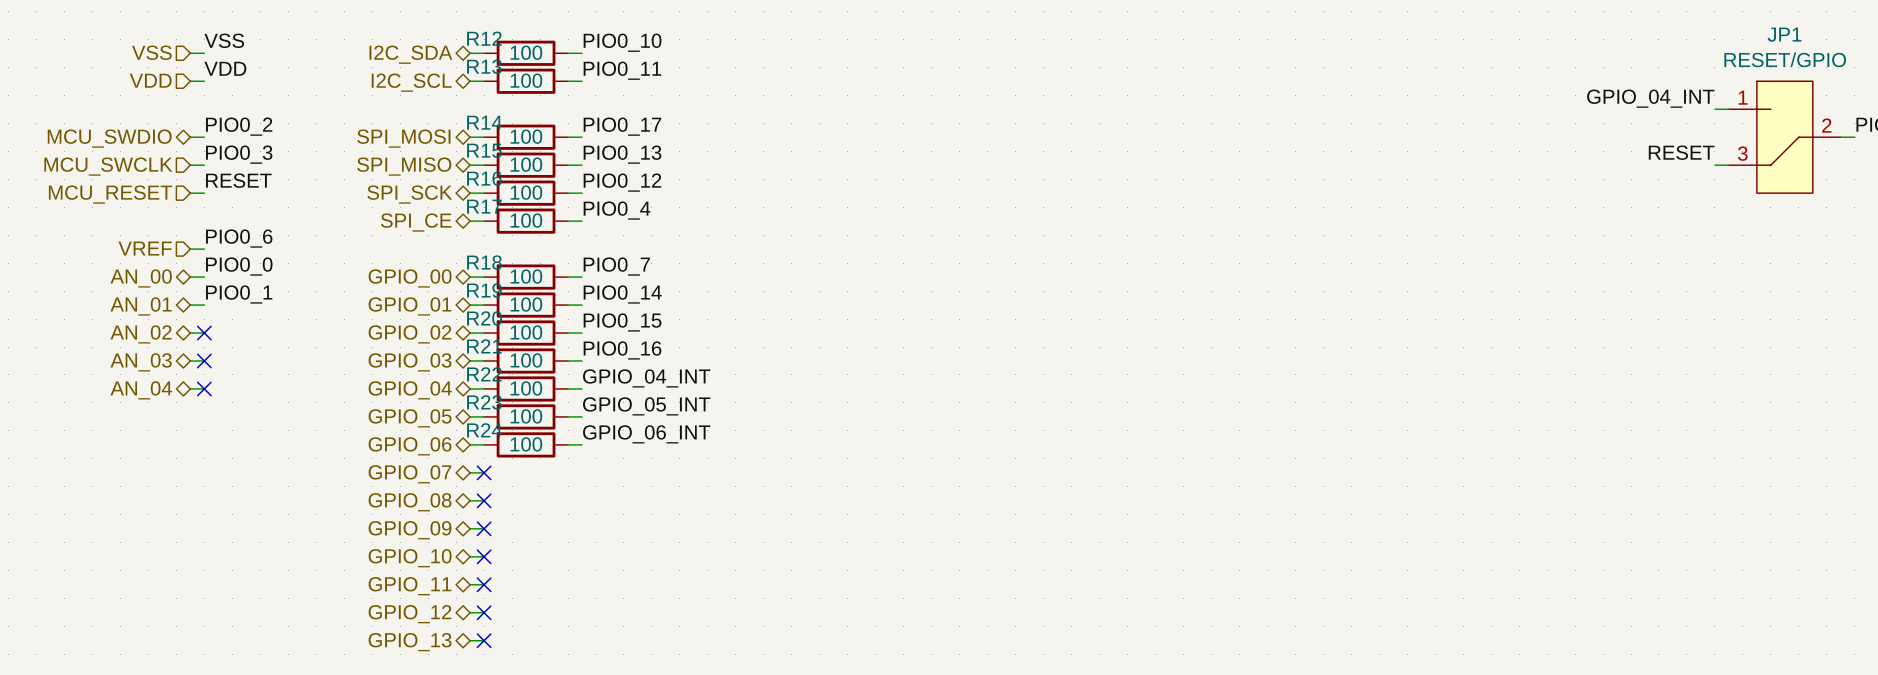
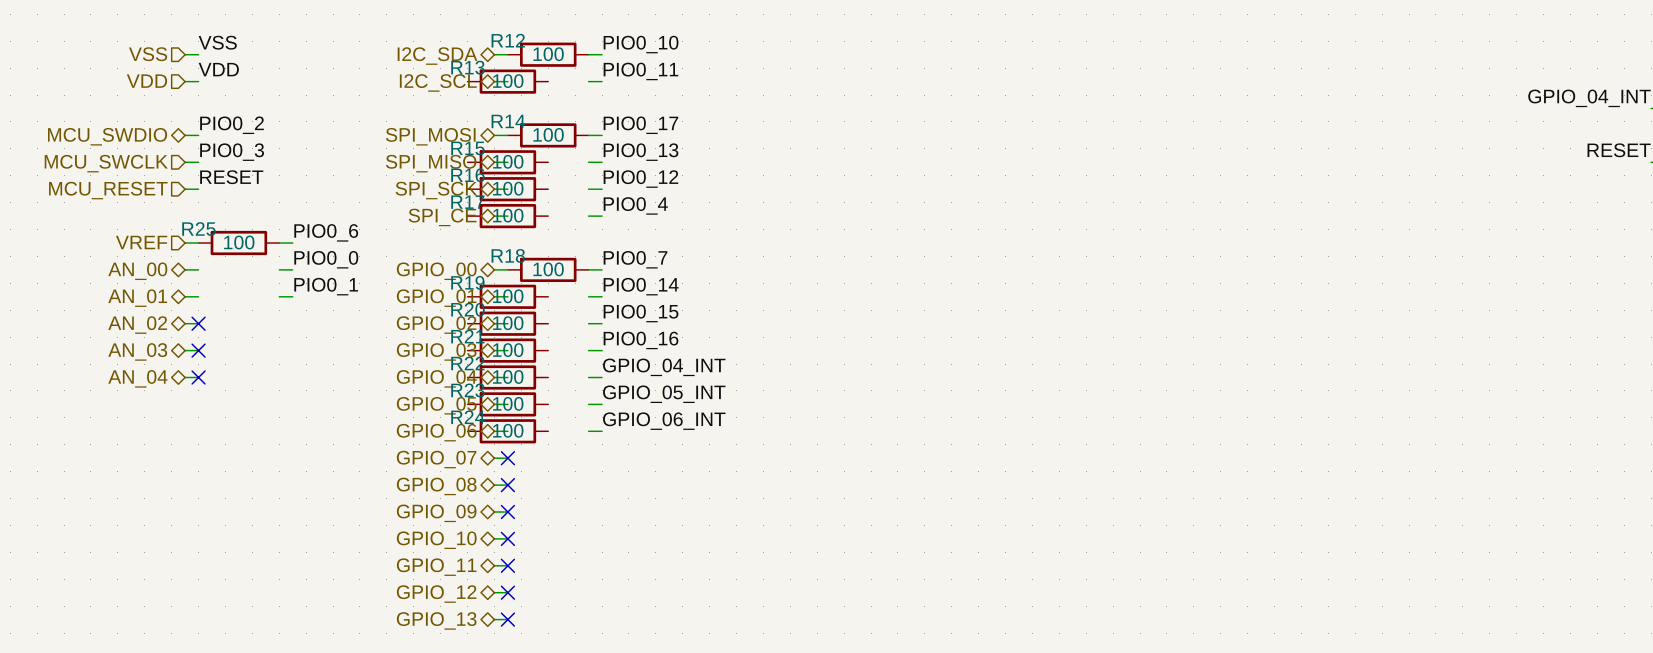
label position: PIO0_10 (622, 42) -> PIO0_10 (641, 44)
wire: (470, 53) (484, 53) -> (494, 54) (507, 54)
R12 position: (526, 53) -> (548, 54)
wire: (568, 53) (582, 53) -> (588, 54) (602, 54)
hierarchical label position: I2C_SDA (410, 54) -> I2C_SDA (437, 56)
label position: PIO0_11 (622, 70) -> PIO0_11 (640, 71)
wire: (470, 81) (484, 81) -> (494, 81) (507, 81)
wire: (568, 81) (582, 81) -> (588, 81) (602, 81)
hierarchical label position: I2C_SCL (411, 82) -> I2C_SCL (438, 82)
label position: PIO0_17 (622, 126) -> PIO0_17 (640, 125)
wire: (470, 137) (484, 137) -> (494, 135) (507, 135)
R14 position: (526, 137) -> (548, 135)
wire: (568, 137) (582, 137) -> (588, 135) (602, 135)
hierarchical label position: SPI_MOSI (403, 138) -> SPI_MOSI (430, 136)
label position: PIO0_13 (622, 154) -> PIO0_13 (641, 152)
wire: (470, 165) (484, 165) -> (494, 162) (507, 162)
wire: (568, 165) (582, 165) -> (588, 162) (602, 162)
hierarchical label position: SPI_MISO (404, 166) -> SPI_MISO (431, 163)
label position: PIO0_12 (622, 182) -> PIO0_12 (640, 179)
wire: (470, 193) (484, 193) -> (494, 189) (507, 189)
wire: (568, 193) (582, 193) -> (588, 189) (602, 189)
hierarchical label position: SPI_SCK (409, 194) -> SPI_SCK (436, 190)
label position: PIO0_4 (617, 210) -> PIO0_4 (635, 205)
wire: (470, 221) (484, 221) -> (494, 216) (507, 216)
wire: (568, 221) (582, 221) -> (588, 216) (602, 216)
hierarchical label position: SPI_CE (416, 222) -> SPI_CE (442, 217)
label position: PIO0_6 (239, 238) -> PIO0_6 (326, 232)
R25: none -> 100 (238, 243)
wire: none -> (279, 243) (292, 243)
label position: PIO0_0 (239, 266) -> PIO0_0 (326, 259)
label position: PIO0_7 (616, 266) -> PIO0_7 (635, 259)
wire: none -> (279, 269) (292, 269)
wire: (470, 277) (484, 277) -> (494, 269) (507, 269)
R18 position: (526, 277) -> (548, 269)
wire: (568, 277) (582, 277) -> (588, 269) (602, 269)
hierarchical label position: GPIO_00 (410, 278) -> GPIO_00 (436, 271)
label position: PIO0_1 (239, 294) -> PIO0_1 (326, 286)
label position: PIO0_14 (622, 294) -> PIO0_14 (641, 286)
wire: none -> (279, 296) (292, 296)
wire: (470, 305) (484, 305) -> (494, 296) (507, 296)
wire: (568, 305) (582, 305) -> (588, 296) (602, 296)
hierarchical label position: GPIO_01 (409, 306) -> GPIO_01 (436, 298)
label position: PIO0_15 (622, 322) -> PIO0_15 (641, 313)
wire: (470, 333) (484, 333) -> (494, 323) (507, 323)
wire: (568, 333) (582, 333) -> (588, 323) (602, 323)
hierarchical label position: GPIO_02 (409, 334) -> GPIO_02 (436, 325)
label position: PIO0_16 (622, 350) -> PIO0_16 (641, 340)
wire: (470, 360) (484, 360) -> (494, 350) (507, 350)
wire: (568, 360) (582, 360) -> (588, 350) (602, 350)
hierarchical label position: GPIO_03 (410, 362) -> GPIO_03 (436, 351)
label position: GPIO_04_INT (646, 378) -> GPIO_04_INT (664, 367)
wire: (470, 388) (484, 388) -> (494, 377) (507, 377)
wire: (568, 388) (582, 388) -> (588, 377) (602, 377)
hierarchical label position: GPIO_04 (410, 390) -> GPIO_04 (436, 378)
label position: GPIO_05_INT (646, 406) -> GPIO_05_INT (664, 394)
wire: (470, 416) (484, 416) -> (494, 404) (507, 404)
wire: (568, 416) (582, 416) -> (588, 404) (602, 404)
hierarchical label position: GPIO_05 (410, 418) -> GPIO_05 (436, 405)
label position: GPIO_06_INT (646, 434) -> GPIO_06_INT (664, 421)
wire: (470, 444) (484, 444) -> (494, 431) (507, 431)
wire: (568, 444) (582, 444) -> (588, 431) (602, 431)
hierarchical label position: GPIO_06 (410, 446) -> GPIO_06 (436, 432)
wire: (470, 472) (484, 472) -> (494, 458) (507, 458)
no-connect mark: (484, 472) -> none
no-connect mark: none -> (507, 458)
hierarchical label position: GPIO_07 (409, 474) -> GPIO_07 (436, 459)
wire: (470, 500) (484, 500) -> (494, 485) (507, 485)
no-connect mark: (484, 500) -> none
no-connect mark: none -> (507, 485)
hierarchical label position: GPIO_08 (410, 502) -> GPIO_08 (436, 486)
wire: (470, 528) (484, 528) -> (494, 512) (507, 512)
no-connect mark: (484, 528) -> none
no-connect mark: none -> (507, 512)
hierarchical label position: GPIO_09 (409, 530) -> GPIO_09 (436, 513)
wire: (470, 556) (484, 556) -> (494, 538) (507, 538)
no-connect mark: (484, 556) -> none
no-connect mark: none -> (507, 538)
hierarchical label position: GPIO_10 (410, 558) -> GPIO_10 (436, 540)
wire: (470, 584) (484, 584) -> (494, 565) (507, 565)
no-connect mark: (484, 584) -> none
no-connect mark: none -> (507, 565)
hierarchical label position: GPIO_11 (409, 586) -> GPIO_11 (436, 567)
wire: (470, 612) (484, 612) -> (494, 592) (507, 592)
no-connect mark: (484, 612) -> none
no-connect mark: none -> (507, 592)
hierarchical label position: GPIO_12 (409, 614) -> GPIO_12 (436, 594)
wire: (470, 640) (484, 640) -> (494, 619) (507, 619)
no-connect mark: (484, 640) -> none
no-connect mark: none -> (507, 619)
hierarchical label position: GPIO_13 (410, 642) -> GPIO_13 (436, 620)

